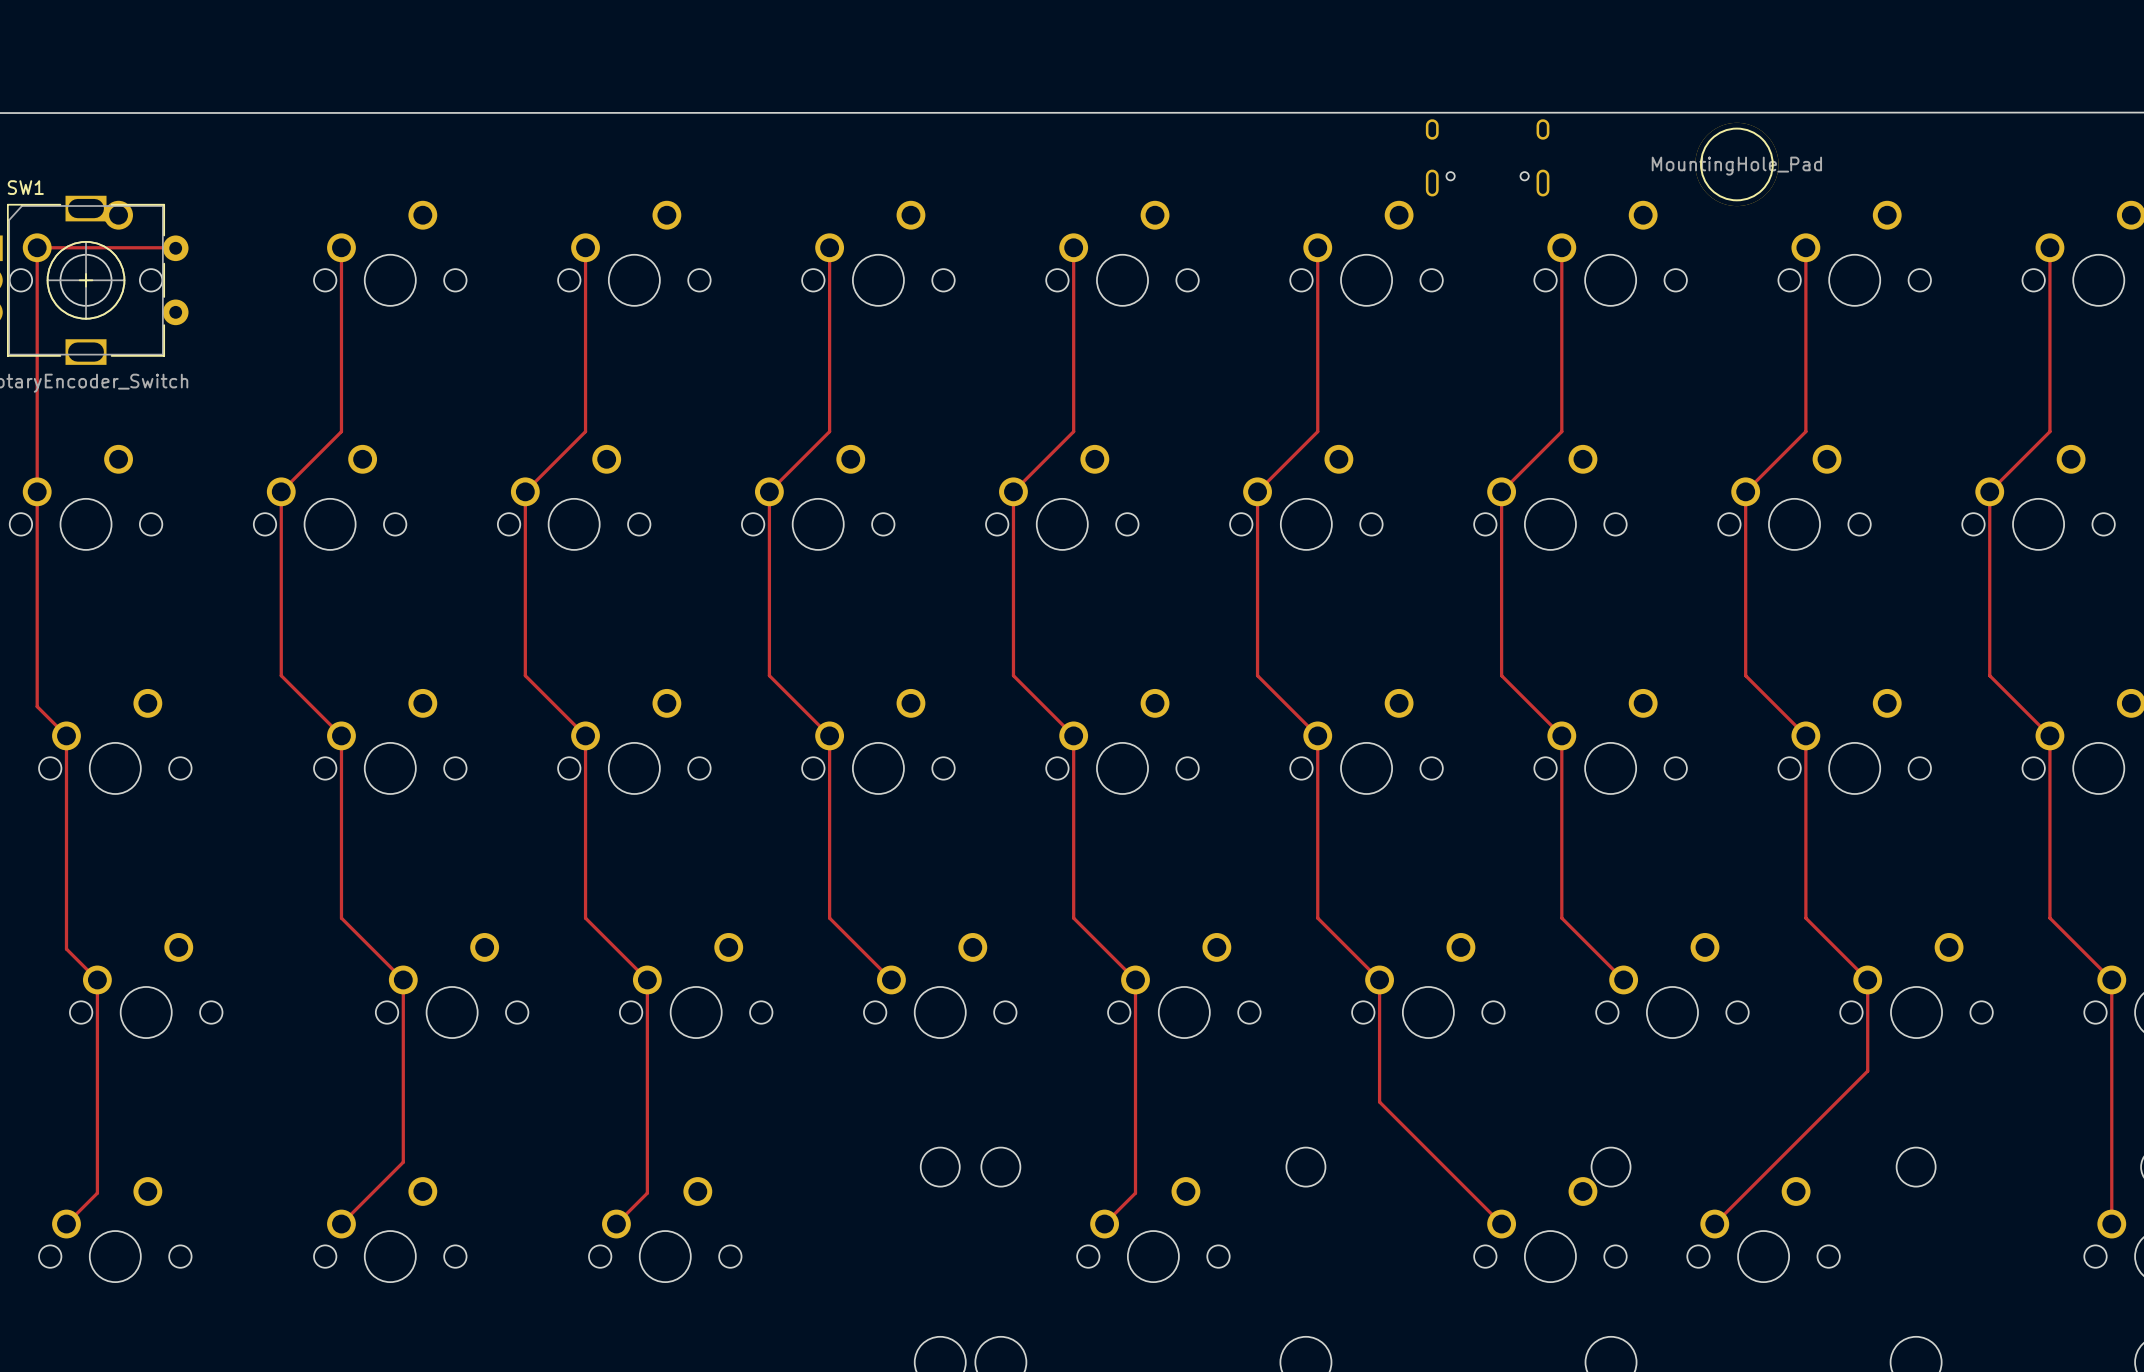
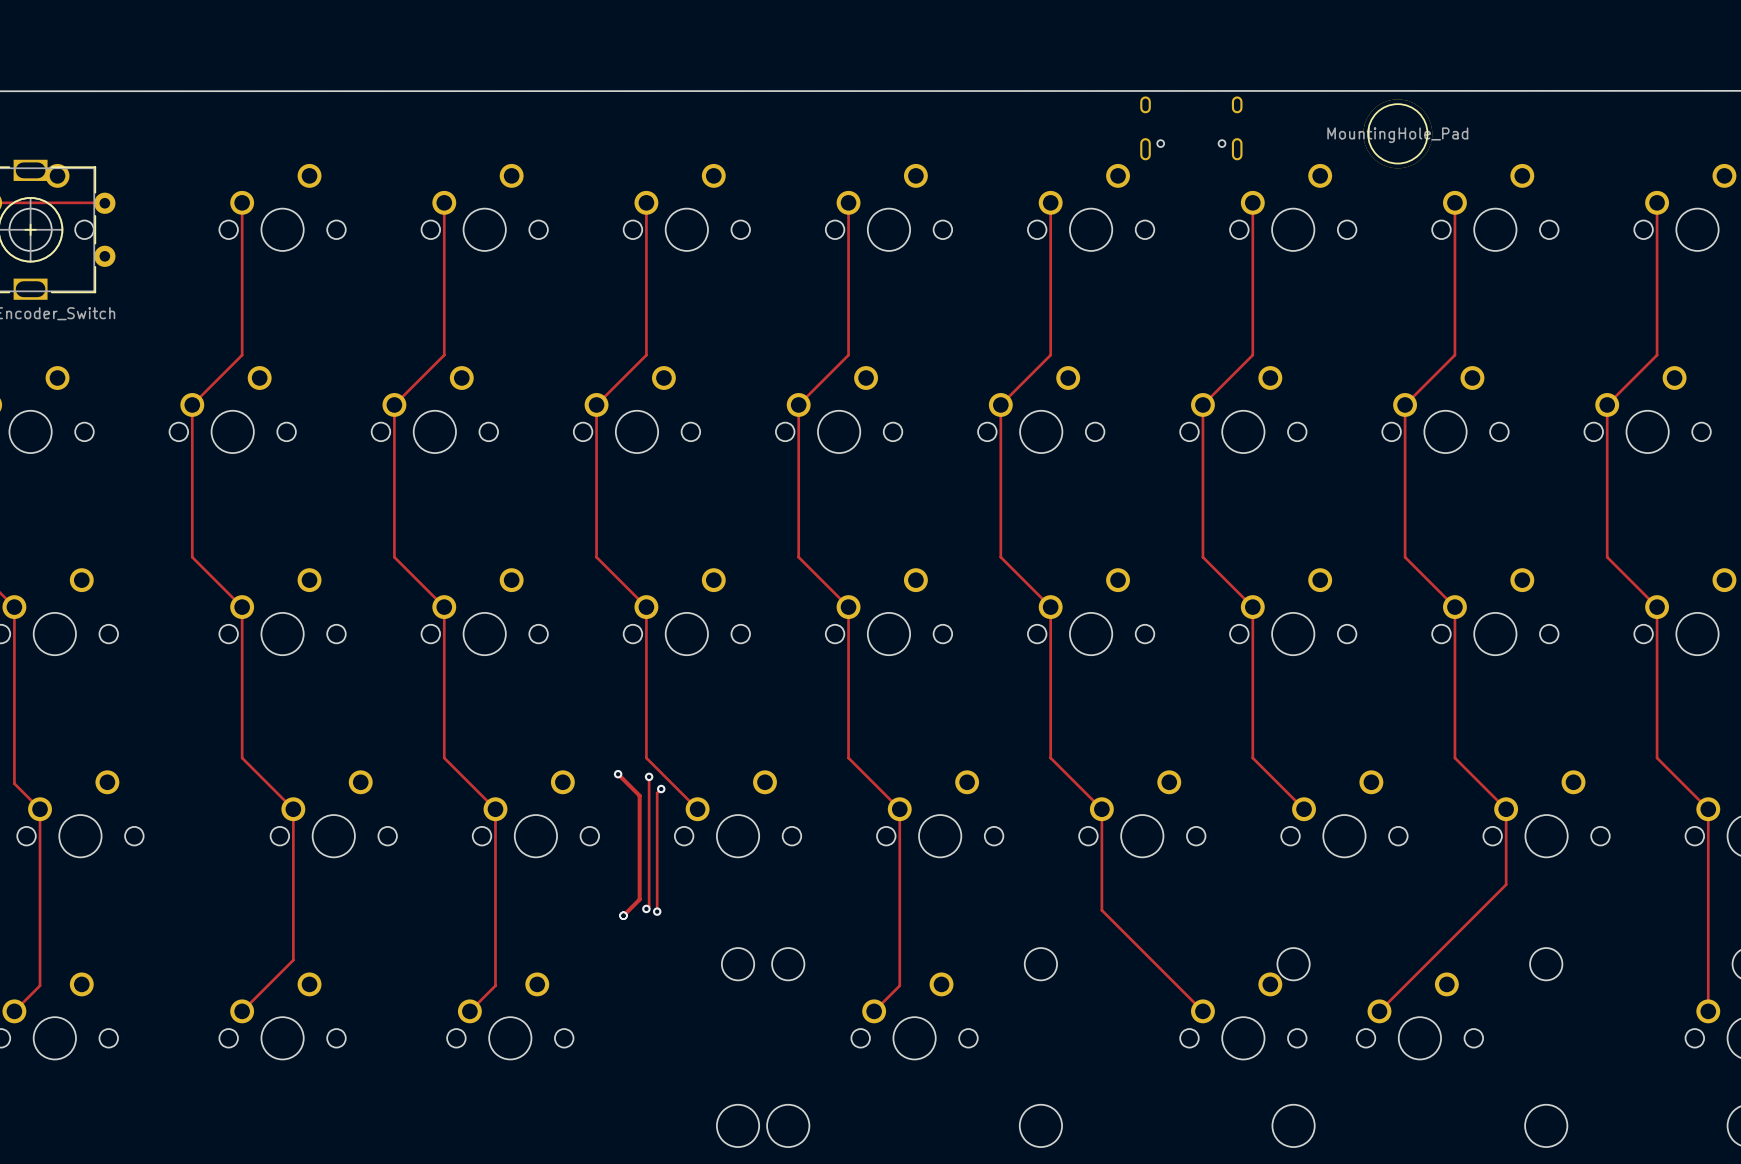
track: none -> (618, 774) (639, 795) (639, 899) (623, 915)
via: none -> (618, 774)
track: none -> (649, 776) (649, 906) (646, 908)
via: none -> (649, 776)
track: none -> (661, 789) (657, 793) (657, 911)
via: none -> (661, 789)
via: none -> (646, 908)
via: none -> (657, 911)
via: none -> (623, 915)

